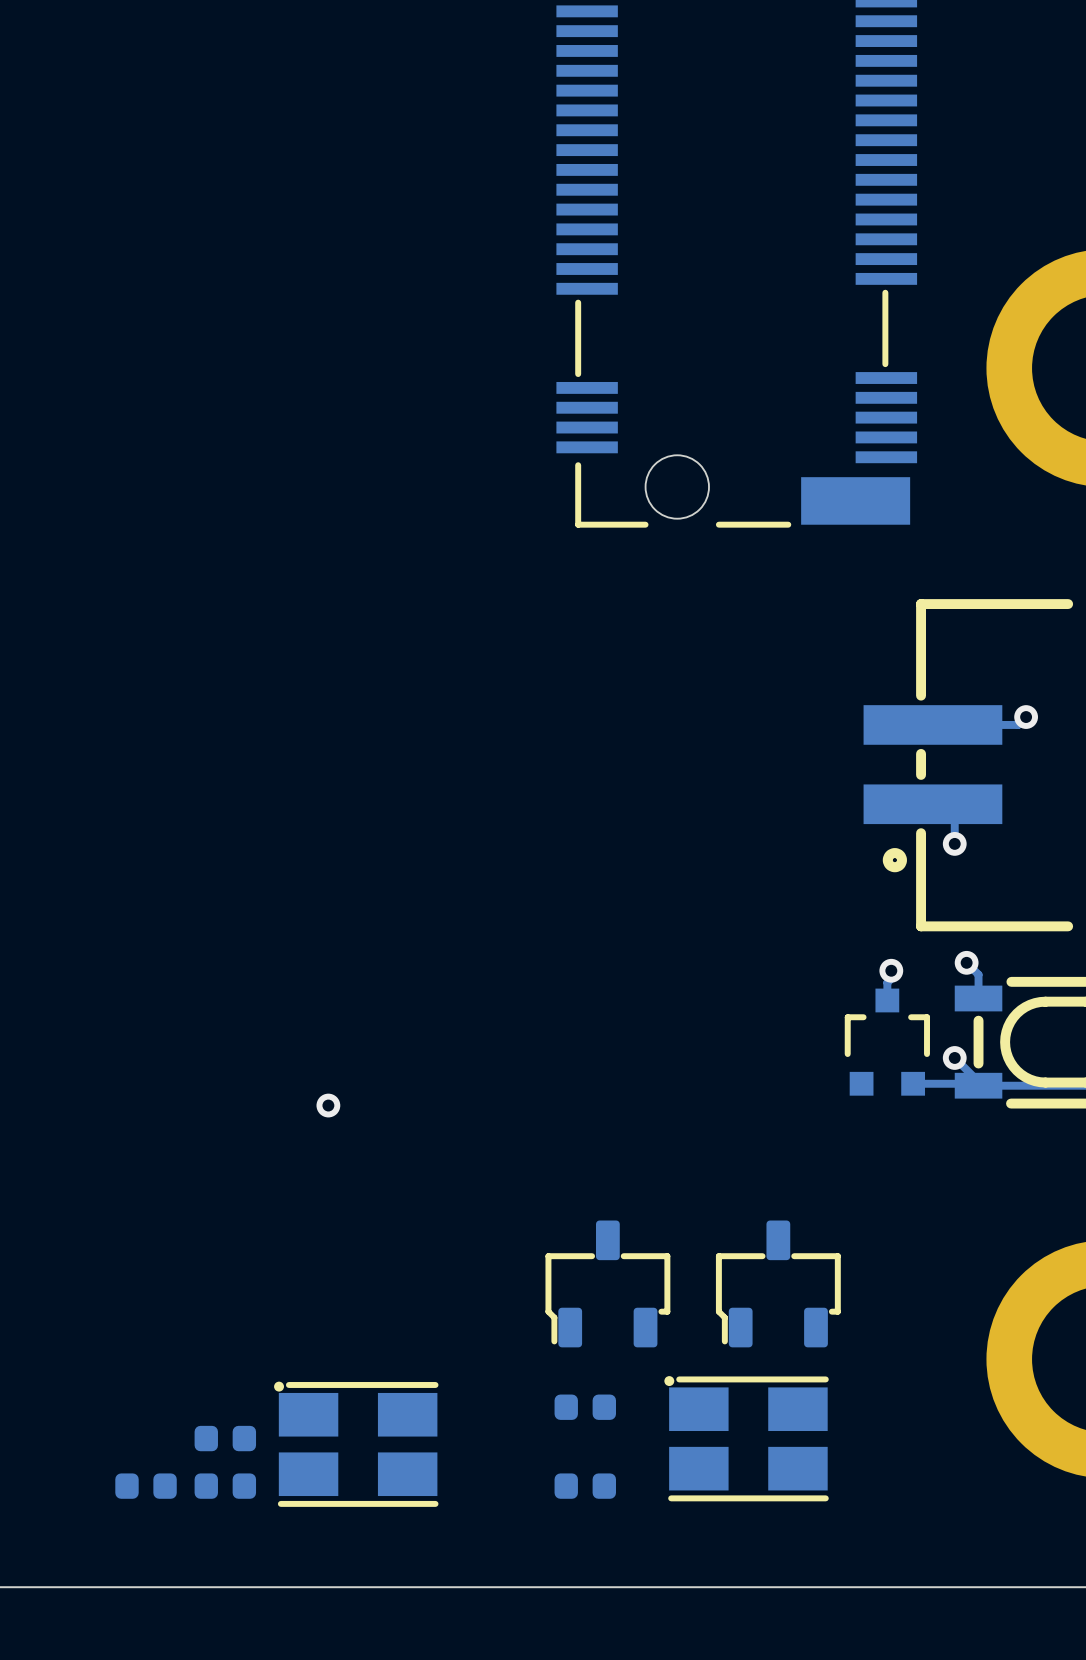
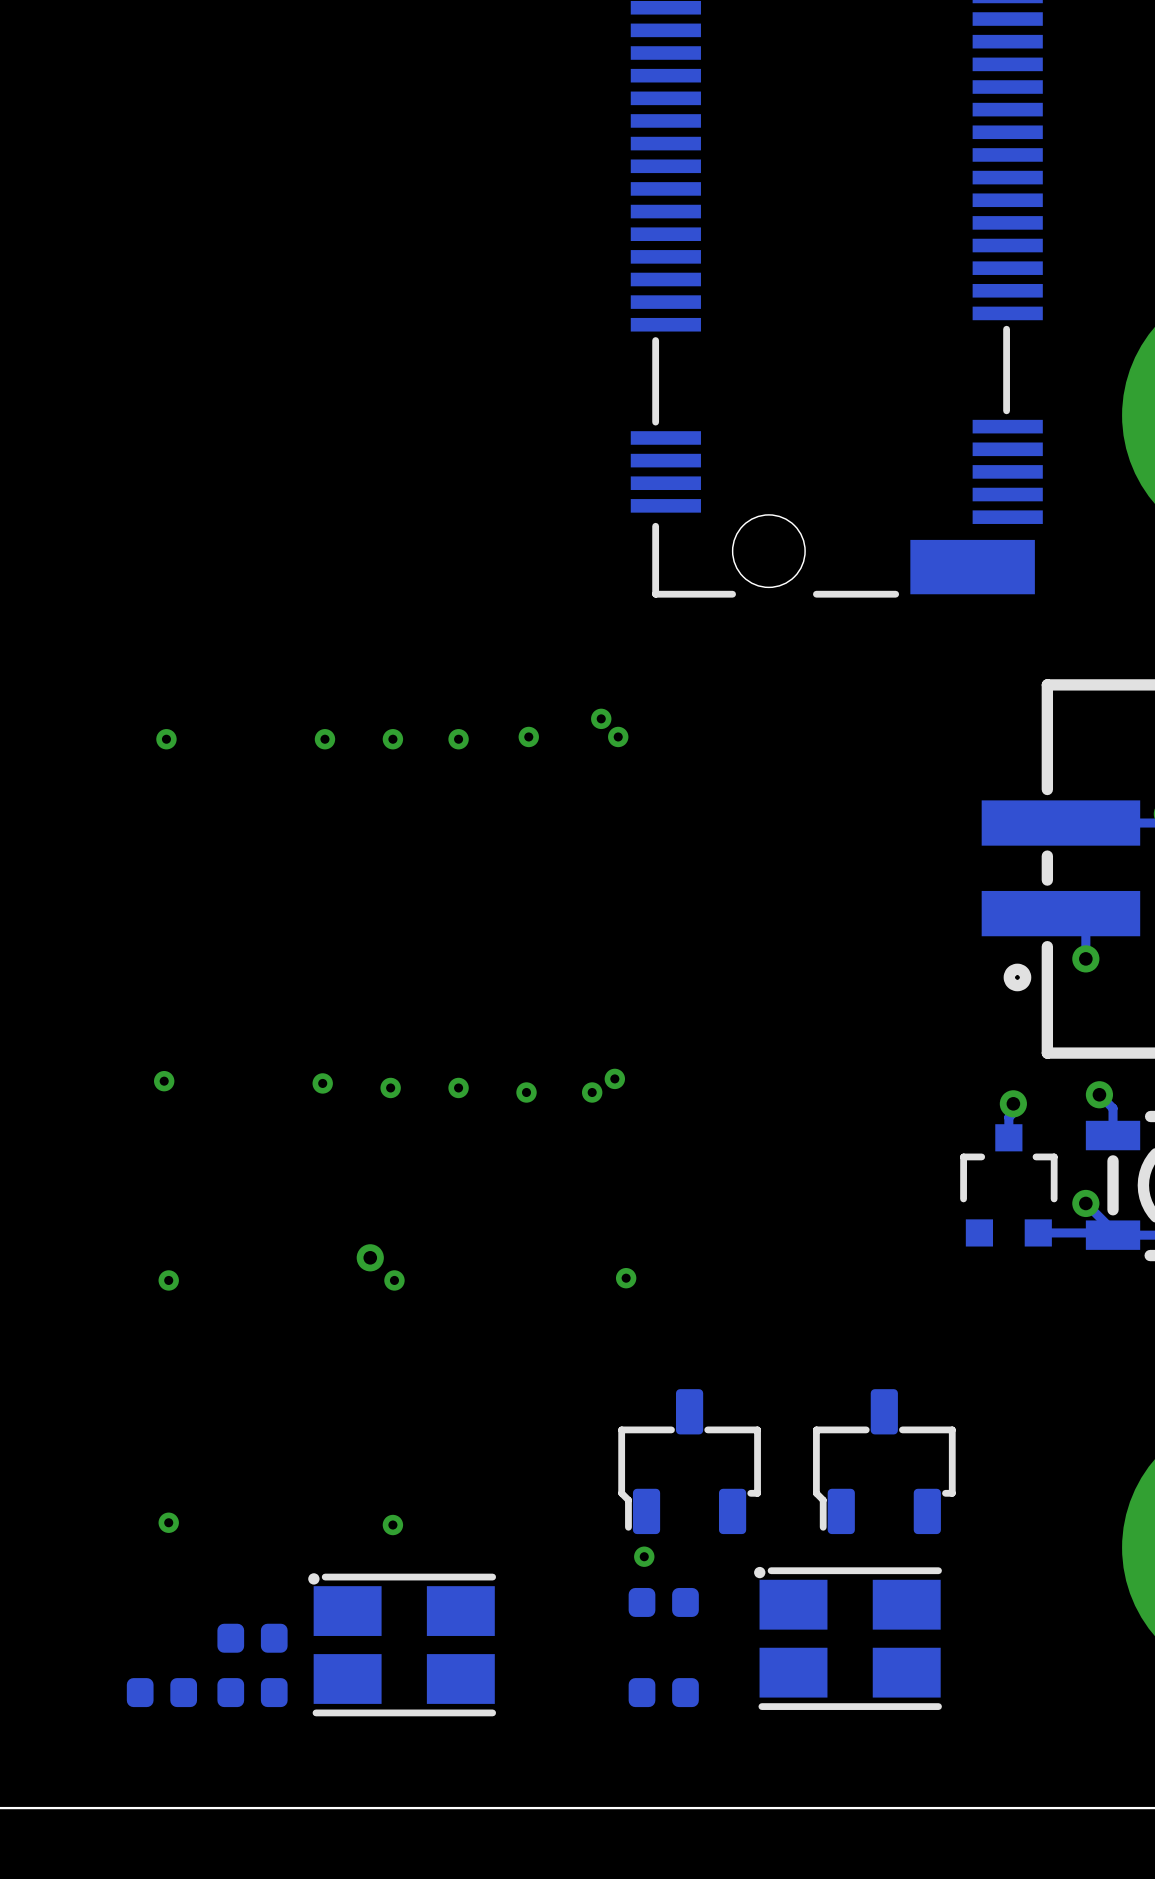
via: none -> (601, 718)
via: none -> (528, 736)
via: none -> (618, 736)
via: none -> (166, 739)
via: none -> (324, 739)
via: none -> (392, 739)
via: none -> (458, 739)
via: none -> (614, 1078)
via: none -> (164, 1081)
via: none -> (322, 1083)
via: none -> (390, 1087)
via: none -> (458, 1087)
via: none -> (526, 1092)
via: none -> (592, 1092)
via: none -> (626, 1278)
via: none -> (168, 1280)
via: none -> (394, 1280)
via: none -> (168, 1522)
via: none -> (392, 1525)
via: none -> (644, 1556)

